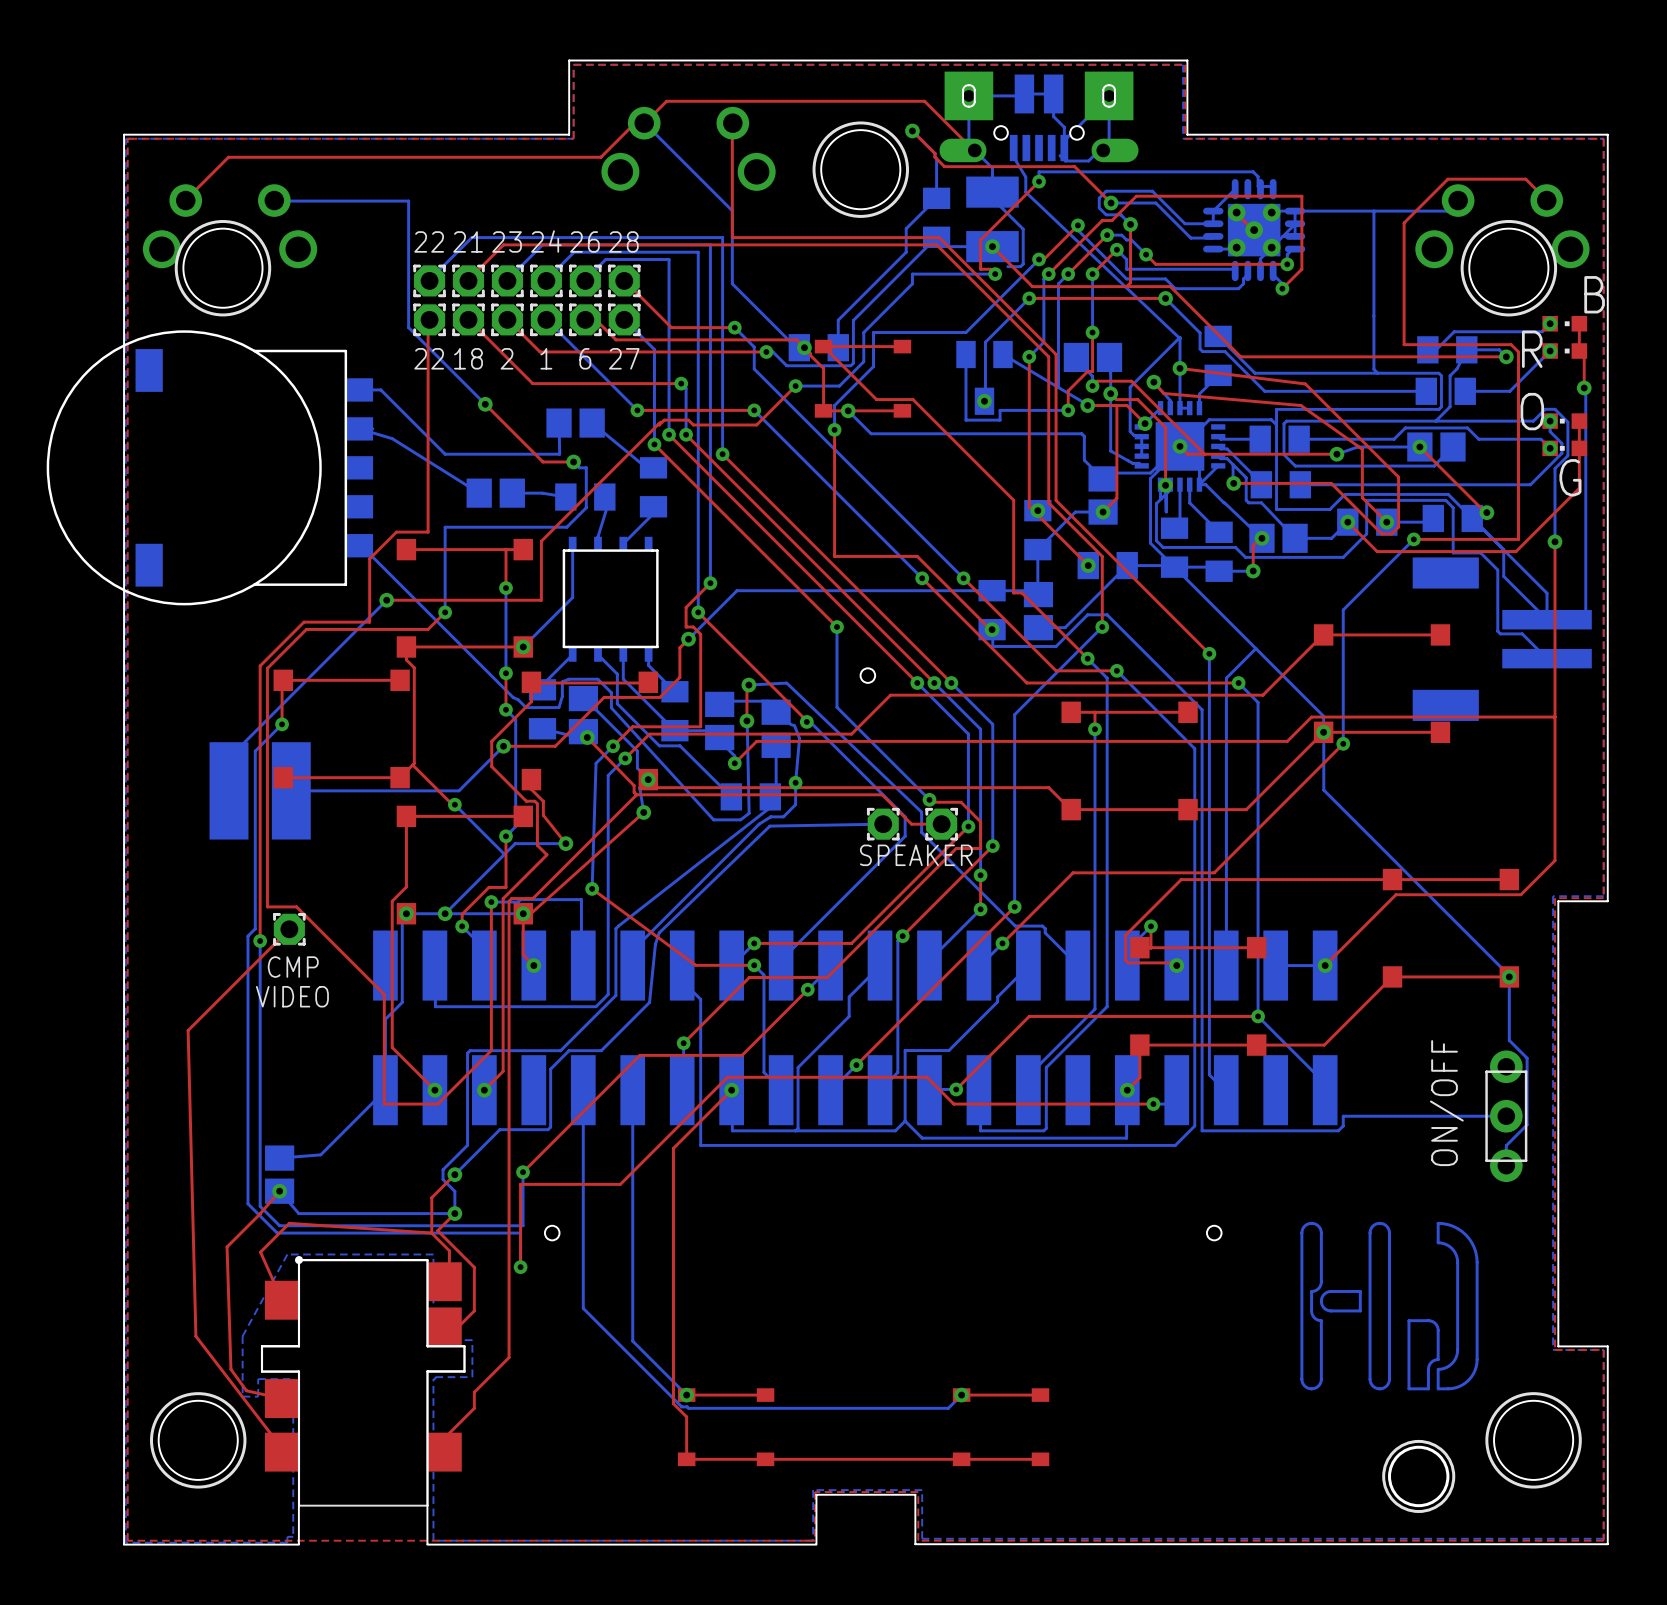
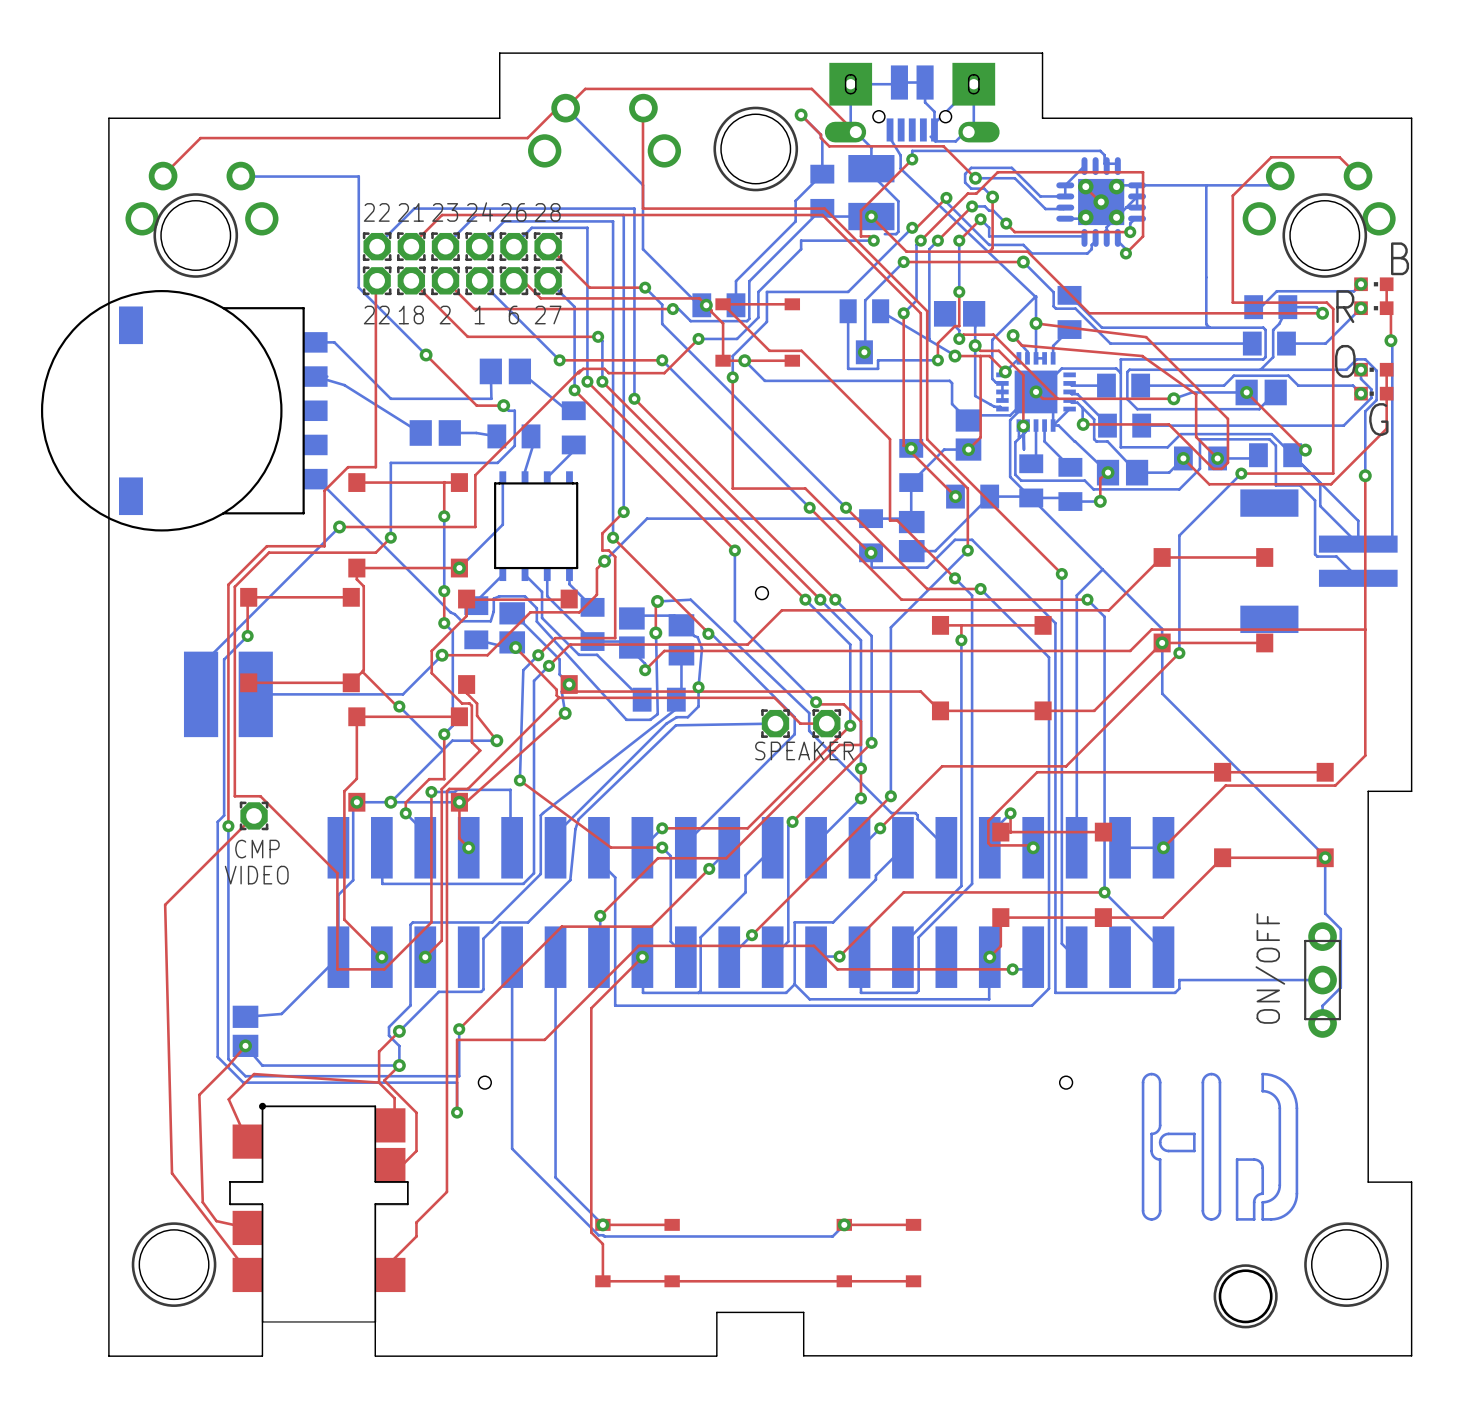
top zone outline: (573, 64) (573, 138) (127, 138) (127, 1540) (815, 1540) (815, 1492) (918, 1492) (918, 1540) (1603, 1540) (1603, 1349) (1555, 1349) (1555, 898) (1603, 898) (1603, 138) (1185, 138) (1185, 64) (573, 64) -> none
bottom zone outline: (573, 64) (573, 138) (125, 138) (125, 1542) (287, 1542) (287, 1536) (293, 1536) (293, 1379) (258, 1379) (258, 1396) (242, 1396) (242, 1336) (287, 1254) (433, 1254) (433, 1340) (472, 1340) (472, 1377) (435, 1377) (433, 1379) (433, 1540) (813, 1540) (813, 1490) (922, 1490) (922, 1538) (1603, 1538) (1603, 1349) (1553, 1349) (1553, 896) (1603, 896) (1603, 138) (1183, 138) (1183, 64) (573, 64) -> none

